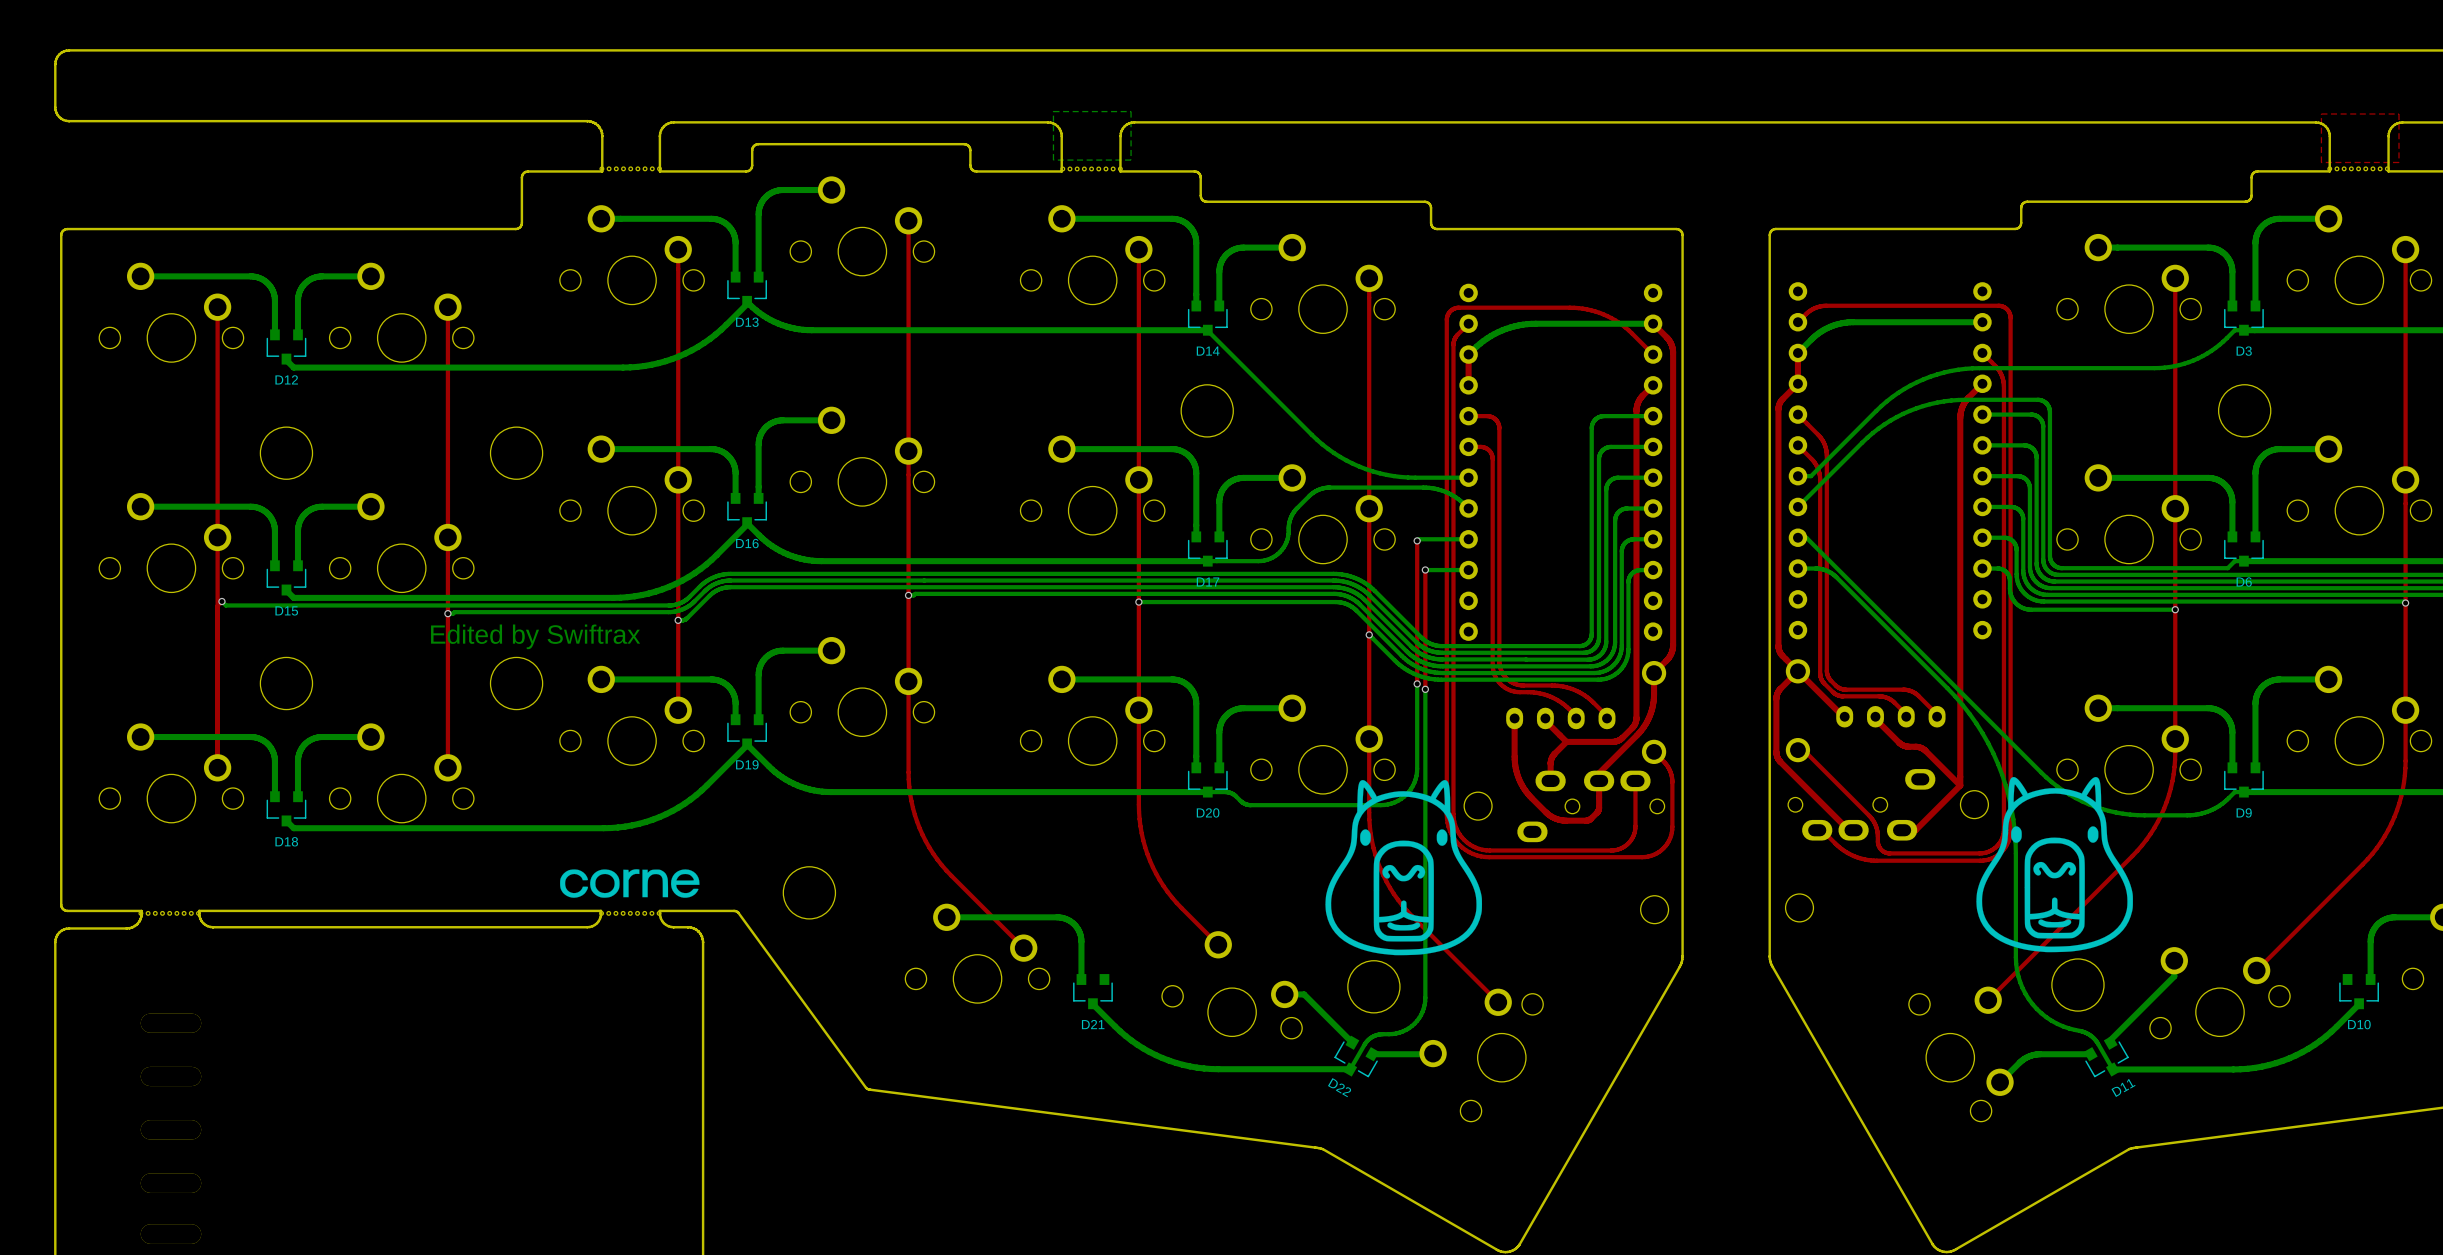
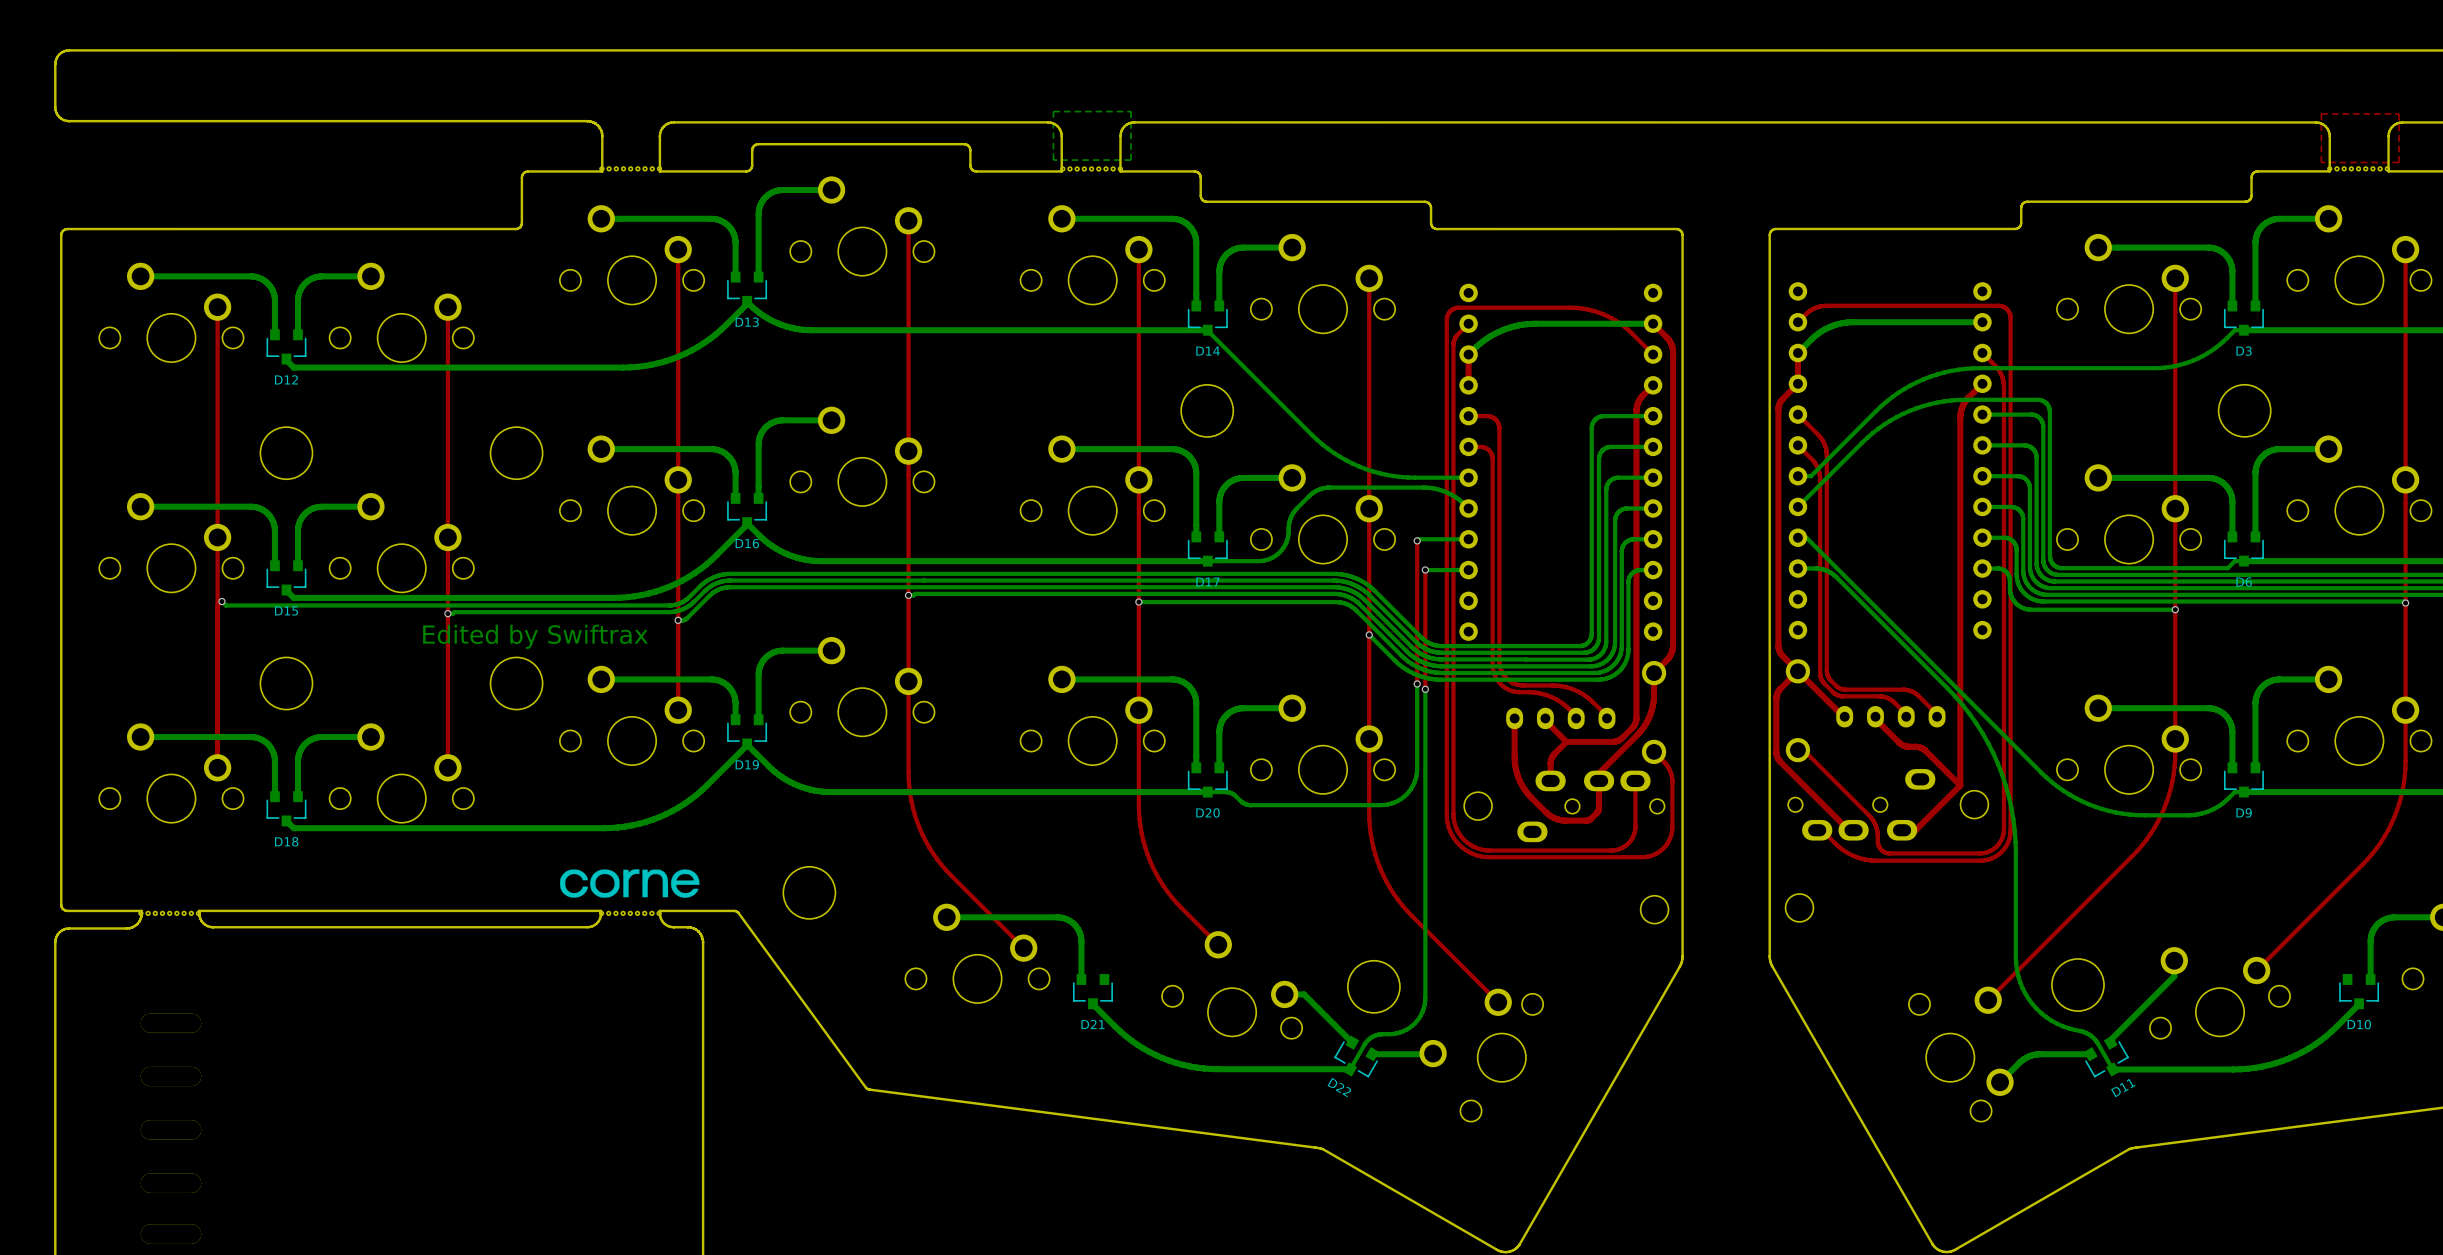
drawing: [1976, 777, 2133, 953] -> none
drawing: [1325, 780, 1483, 956] -> none

